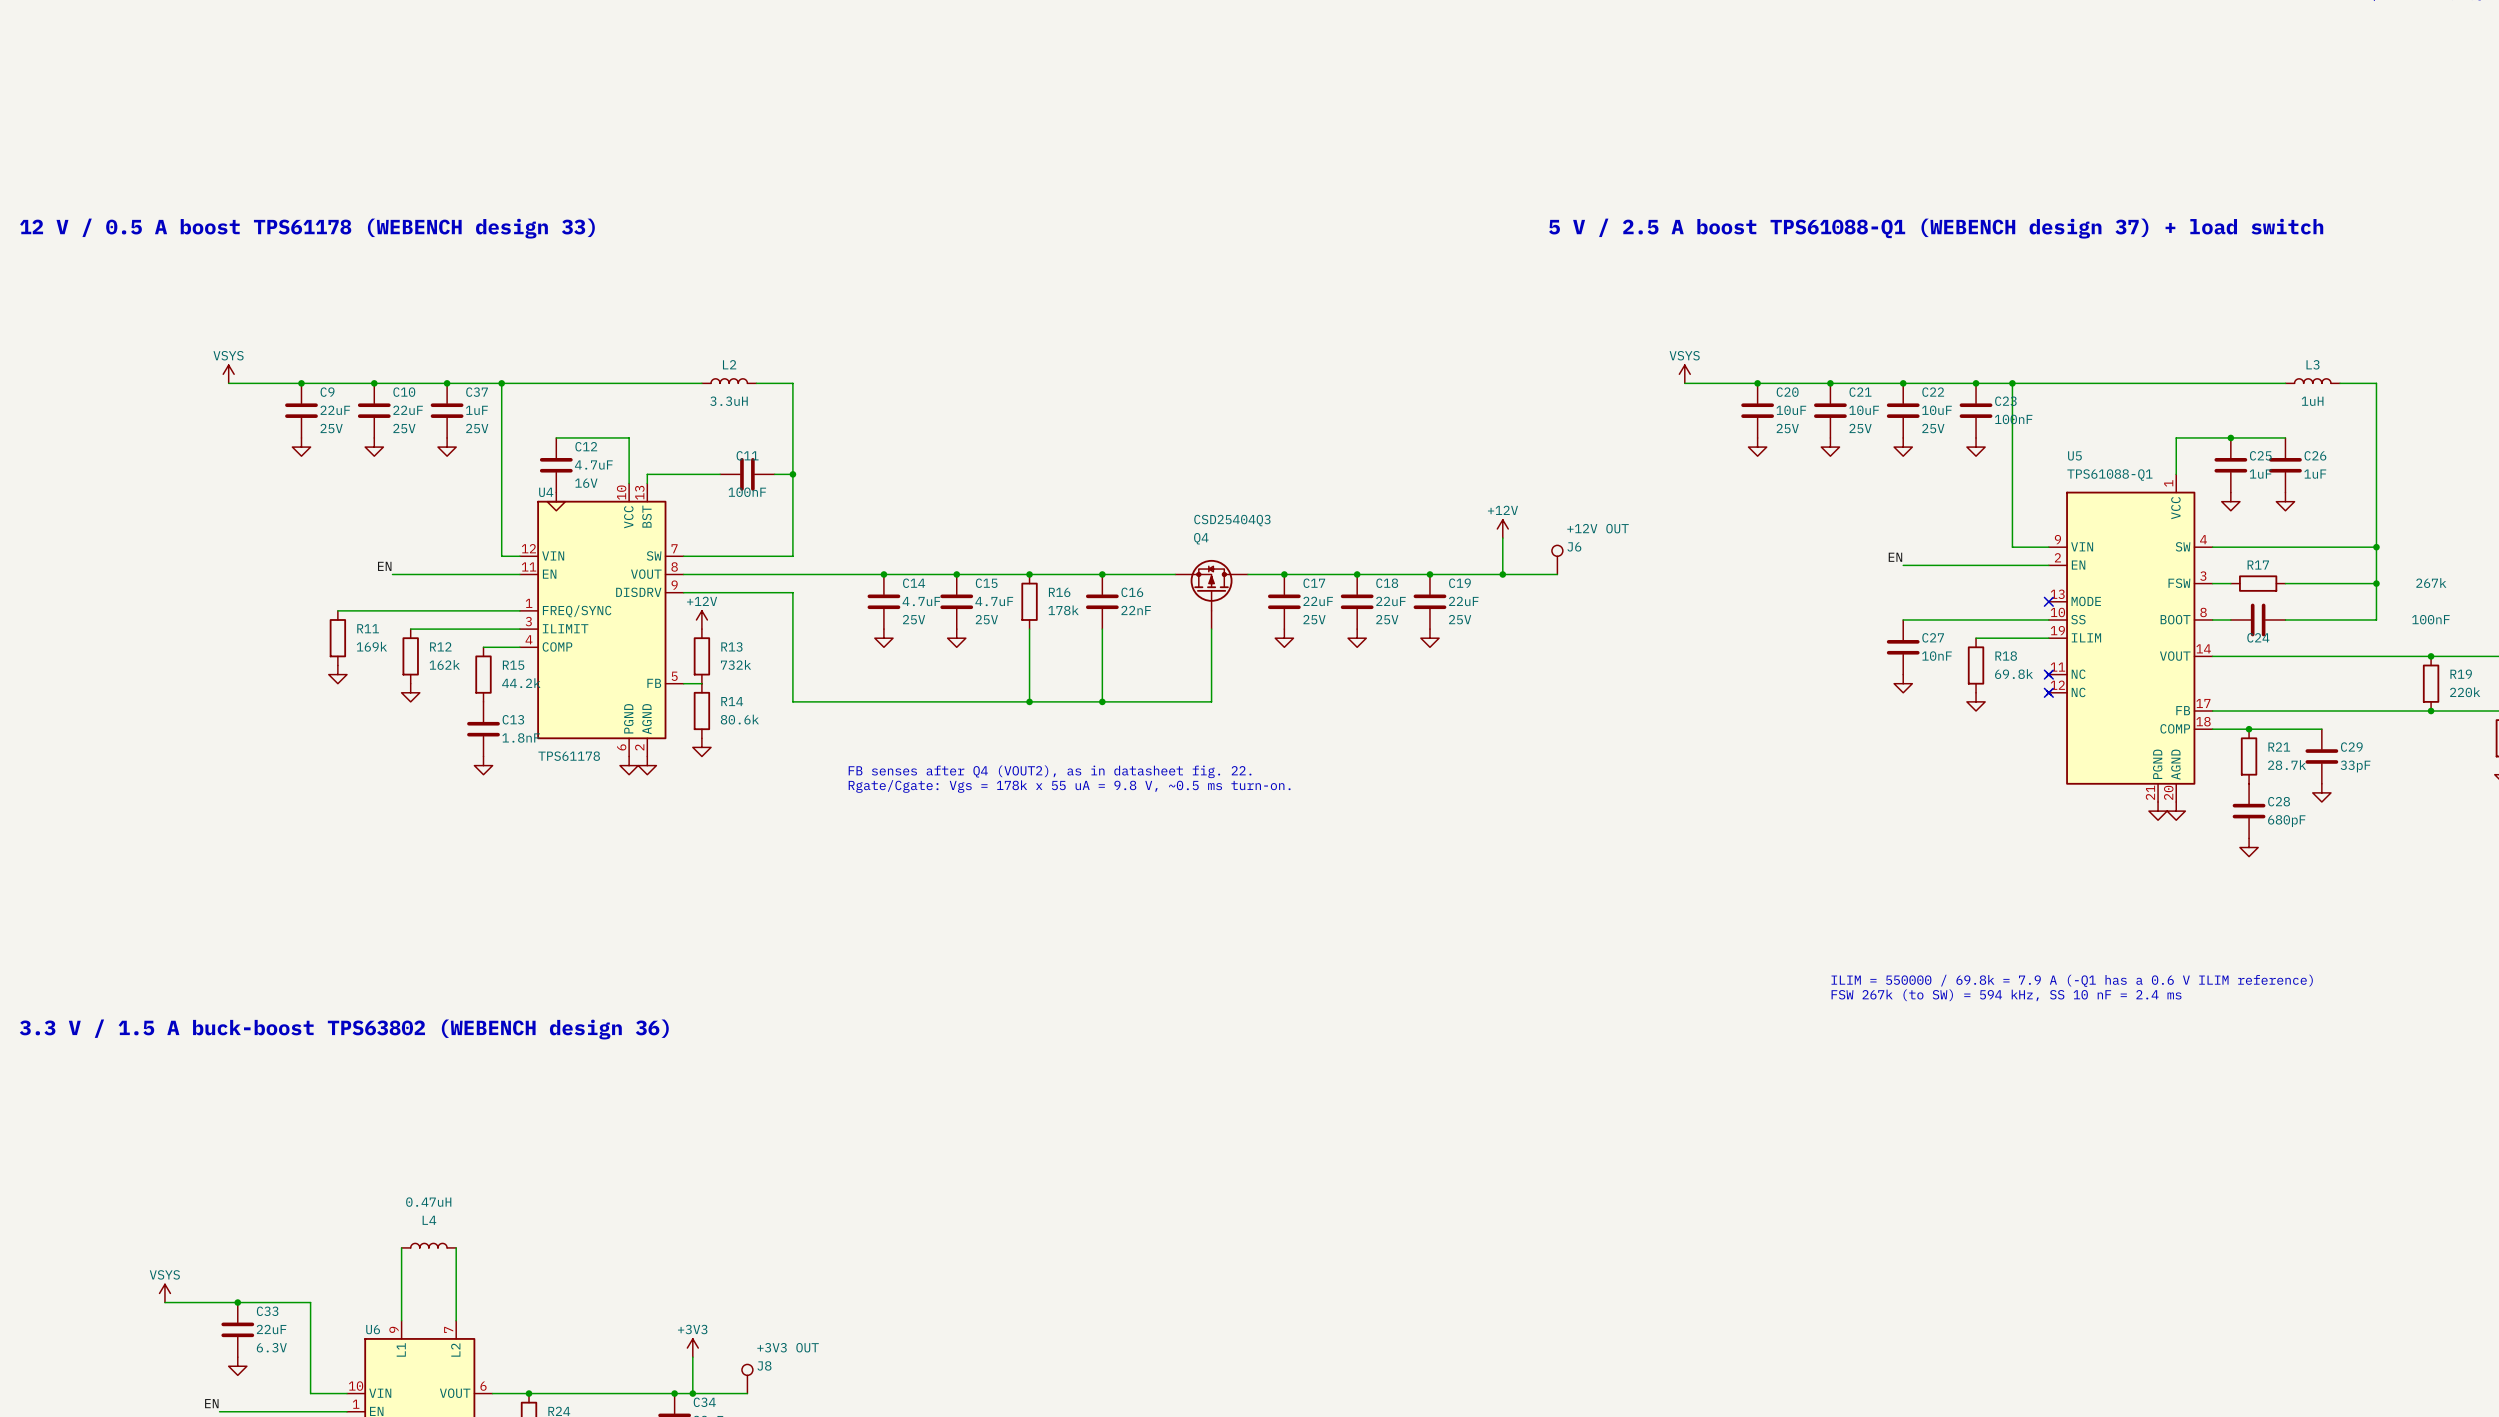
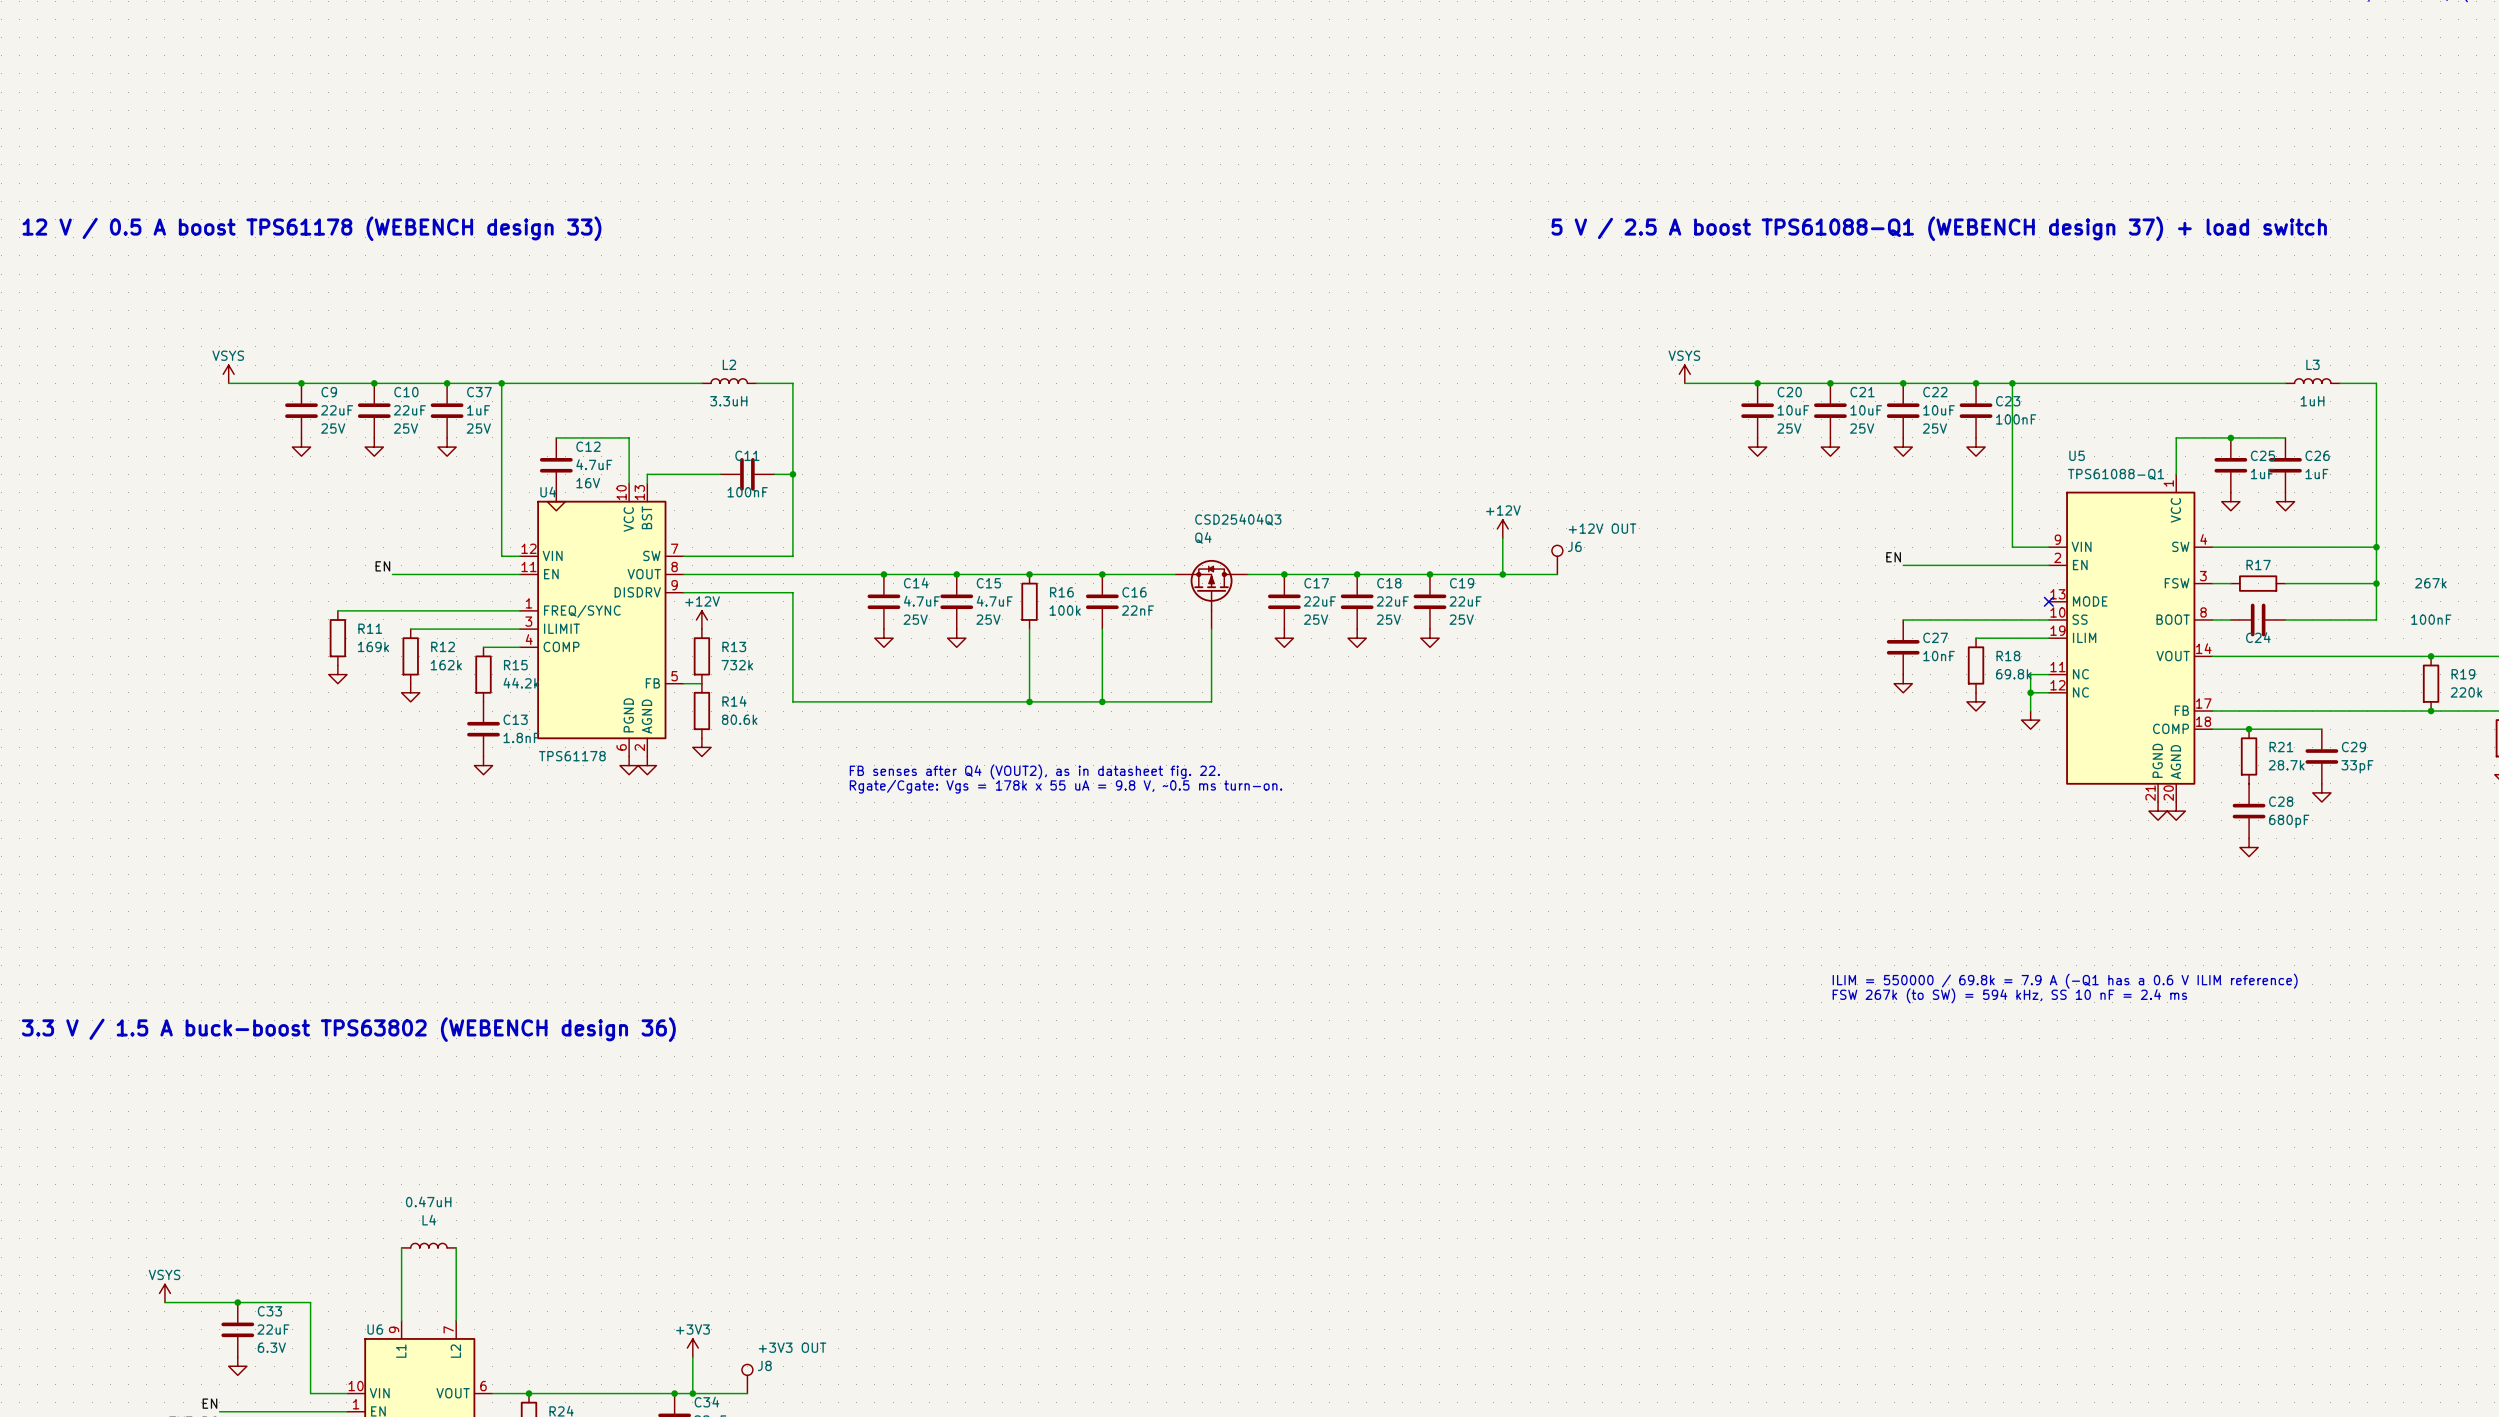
U5 symbol: [2046, 474, 2213, 803] -> [2048, 474, 2213, 803]
R16 value: 178k (1063, 610) -> 100k (1065, 610)
wire: none -> (2048, 674) (2030, 674) (2030, 711)
no-connect mark: (2048, 674) -> none
wire: none -> (2030, 692) (2048, 692)
junction: none -> (2030, 692)
no-connect mark: (2048, 692) -> none
power symbol: none -> (2030, 720)

